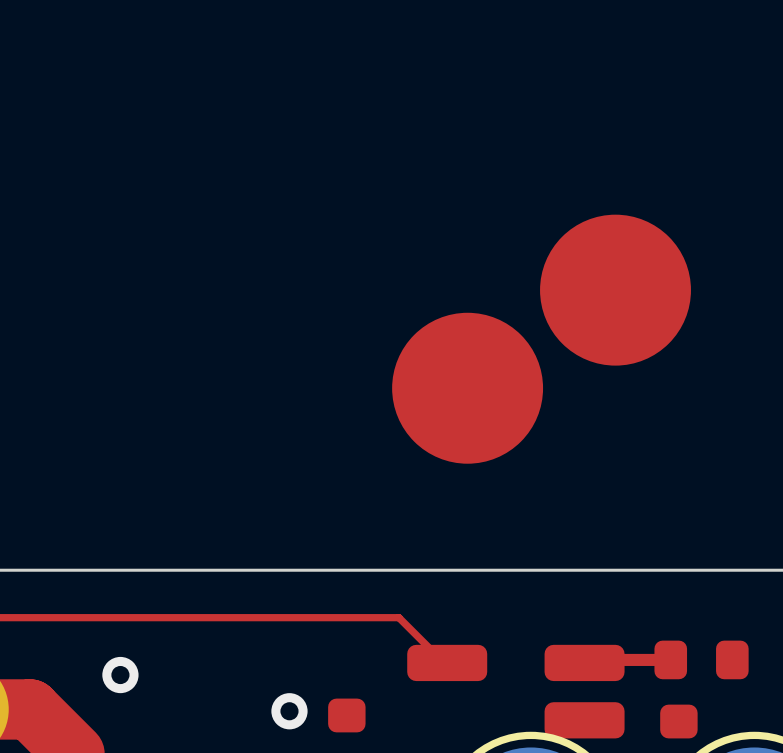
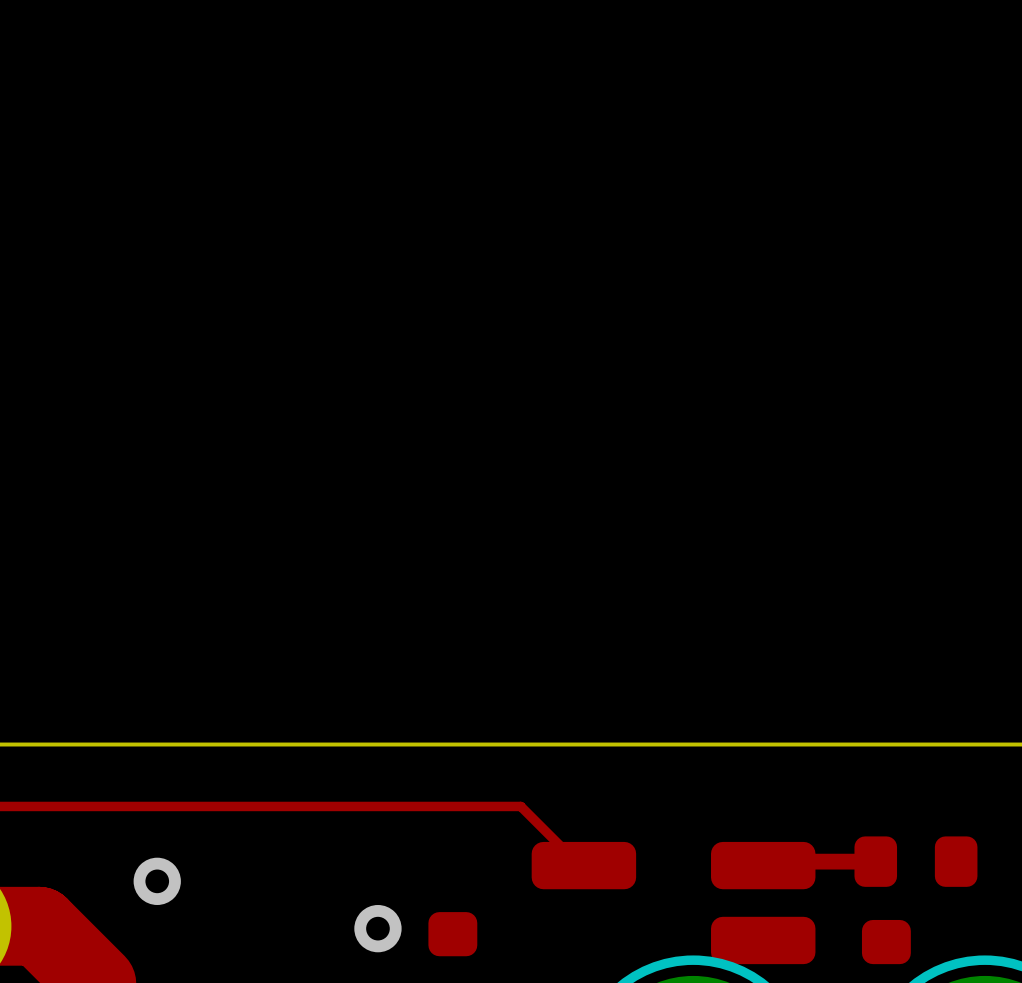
part: (615, 290) -> none
part: (467, 388) -> none

